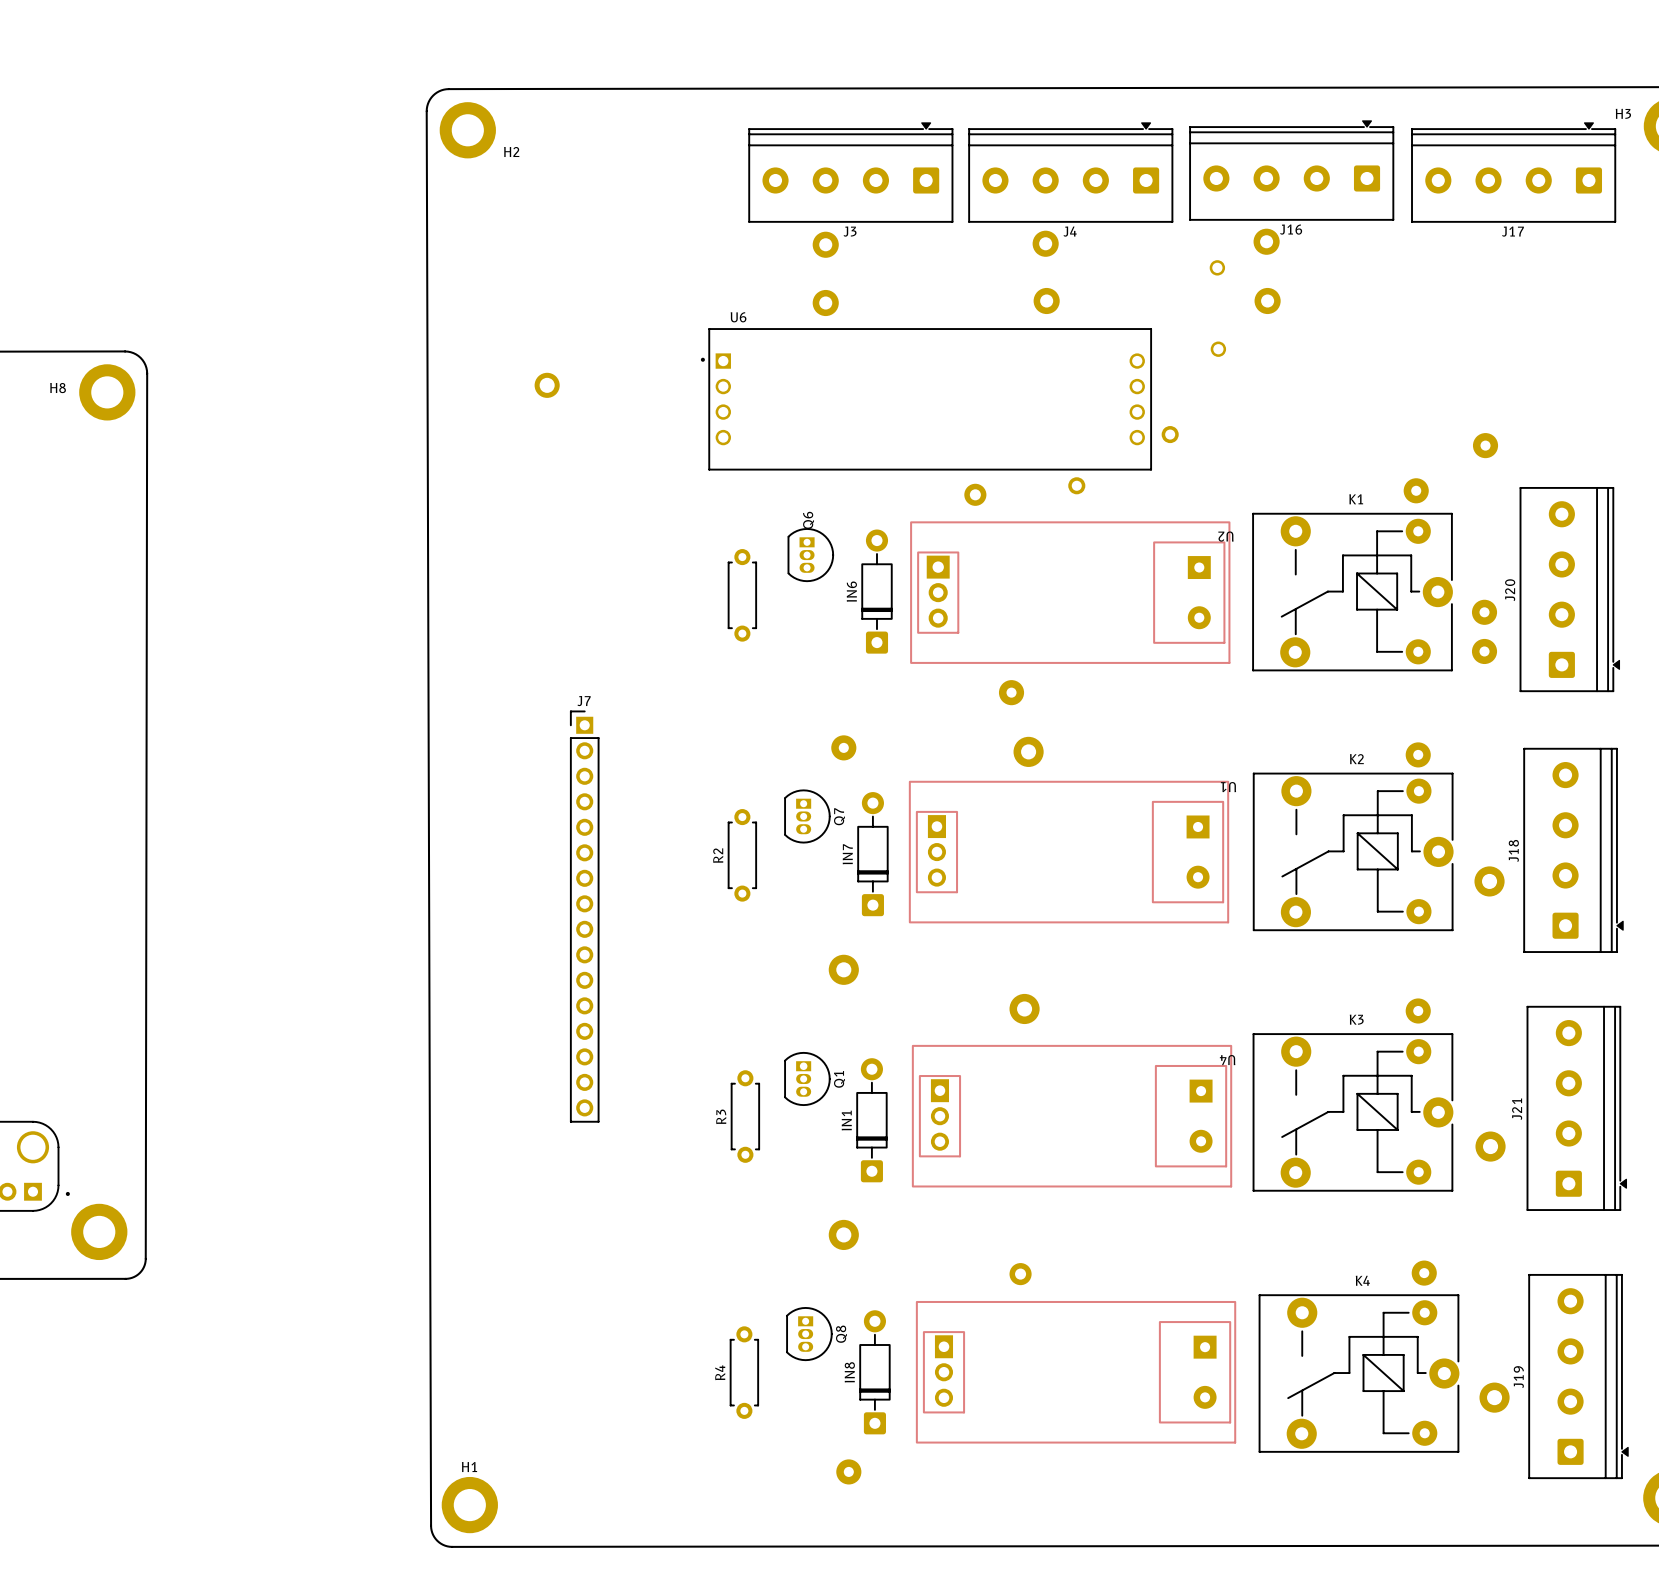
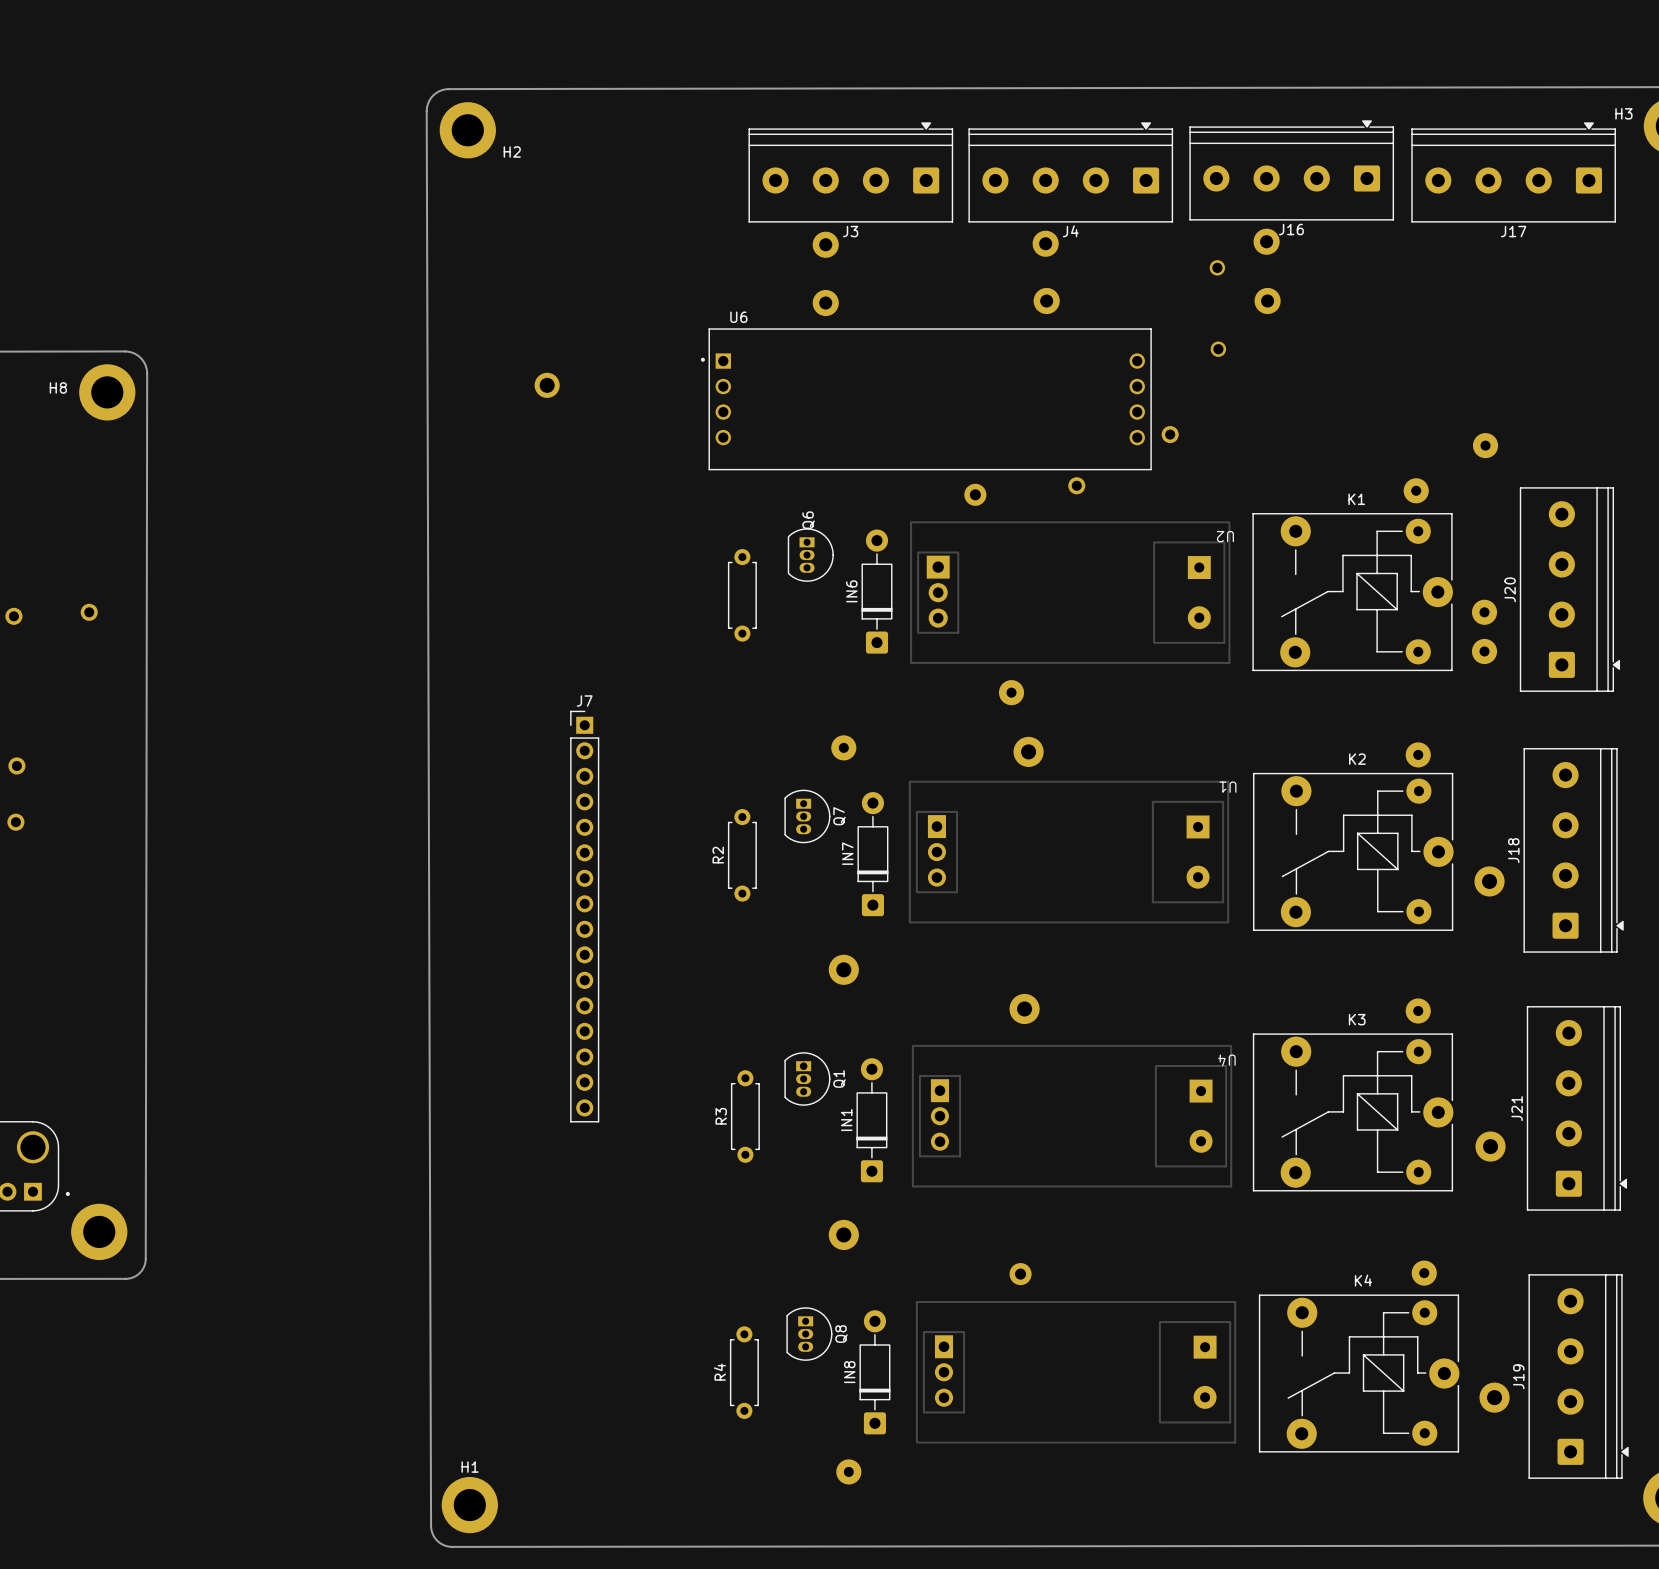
part: none -> (89, 612)
part: none -> (13, 616)
part: none -> (16, 765)
part: none -> (15, 822)

